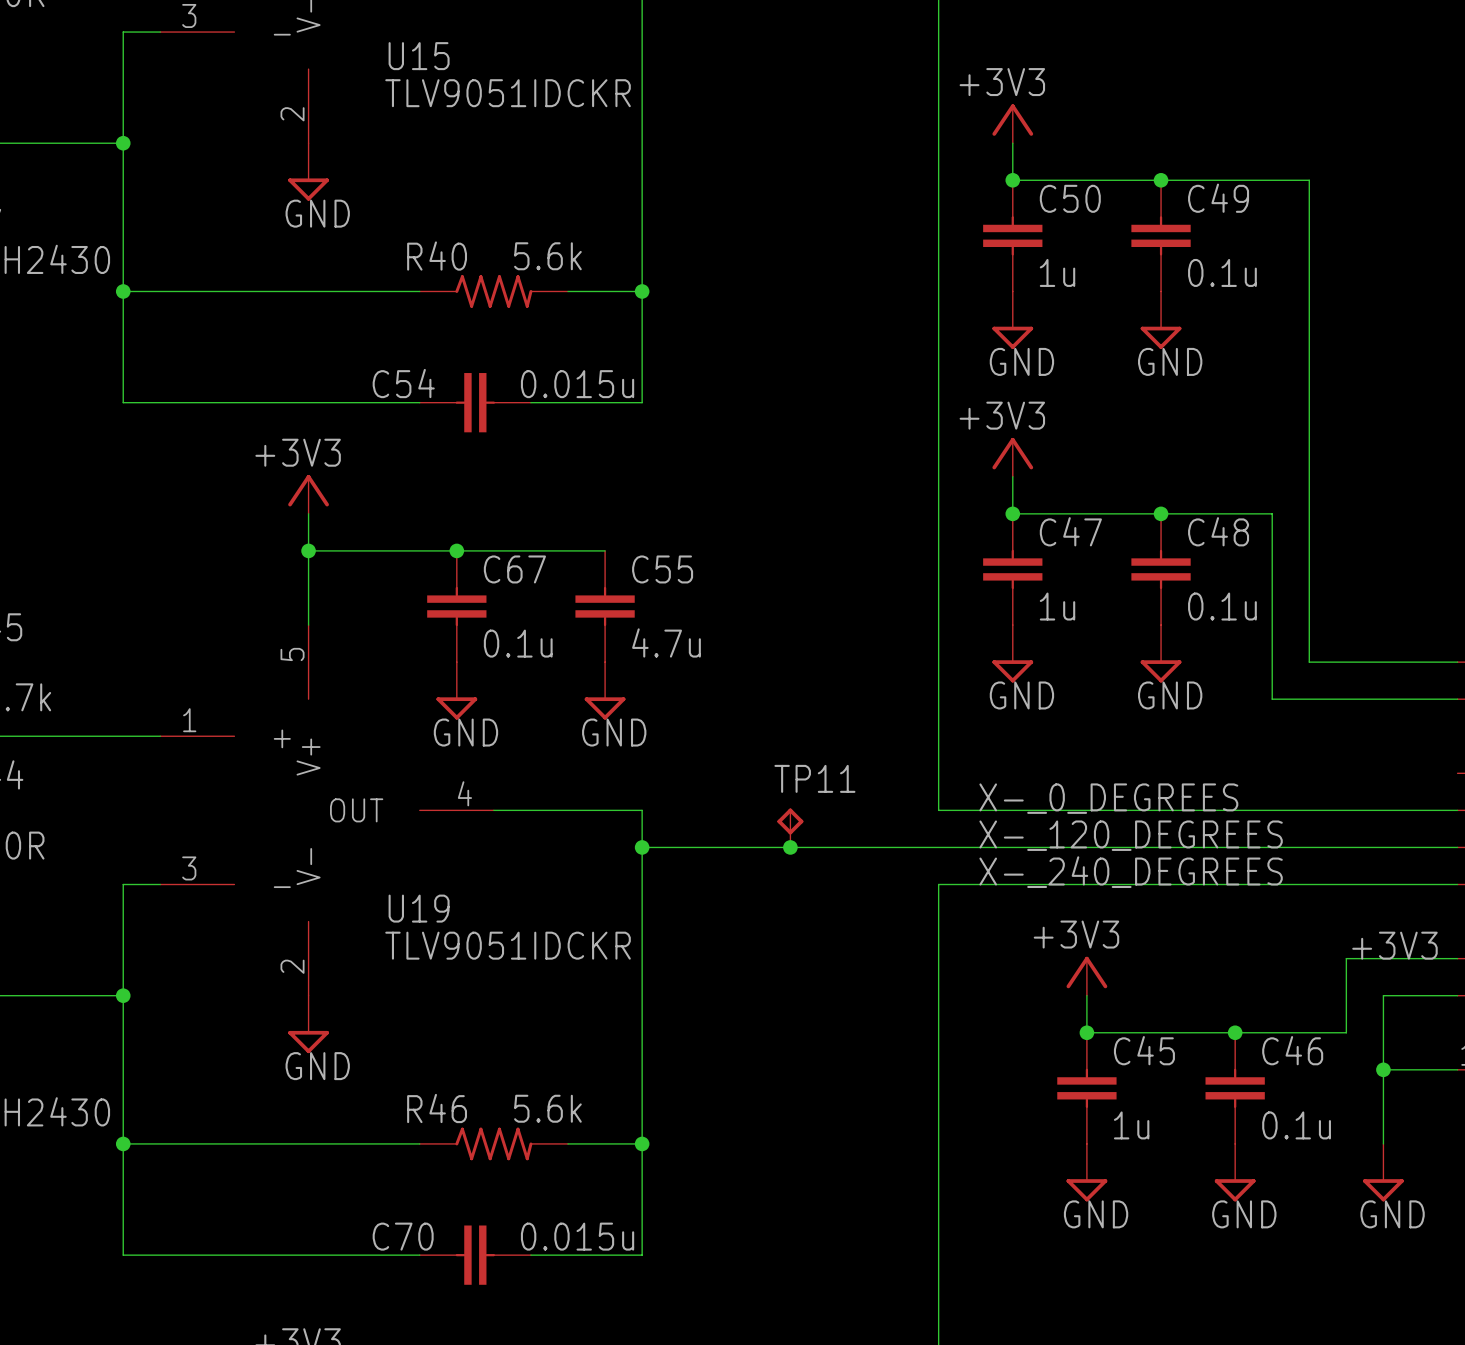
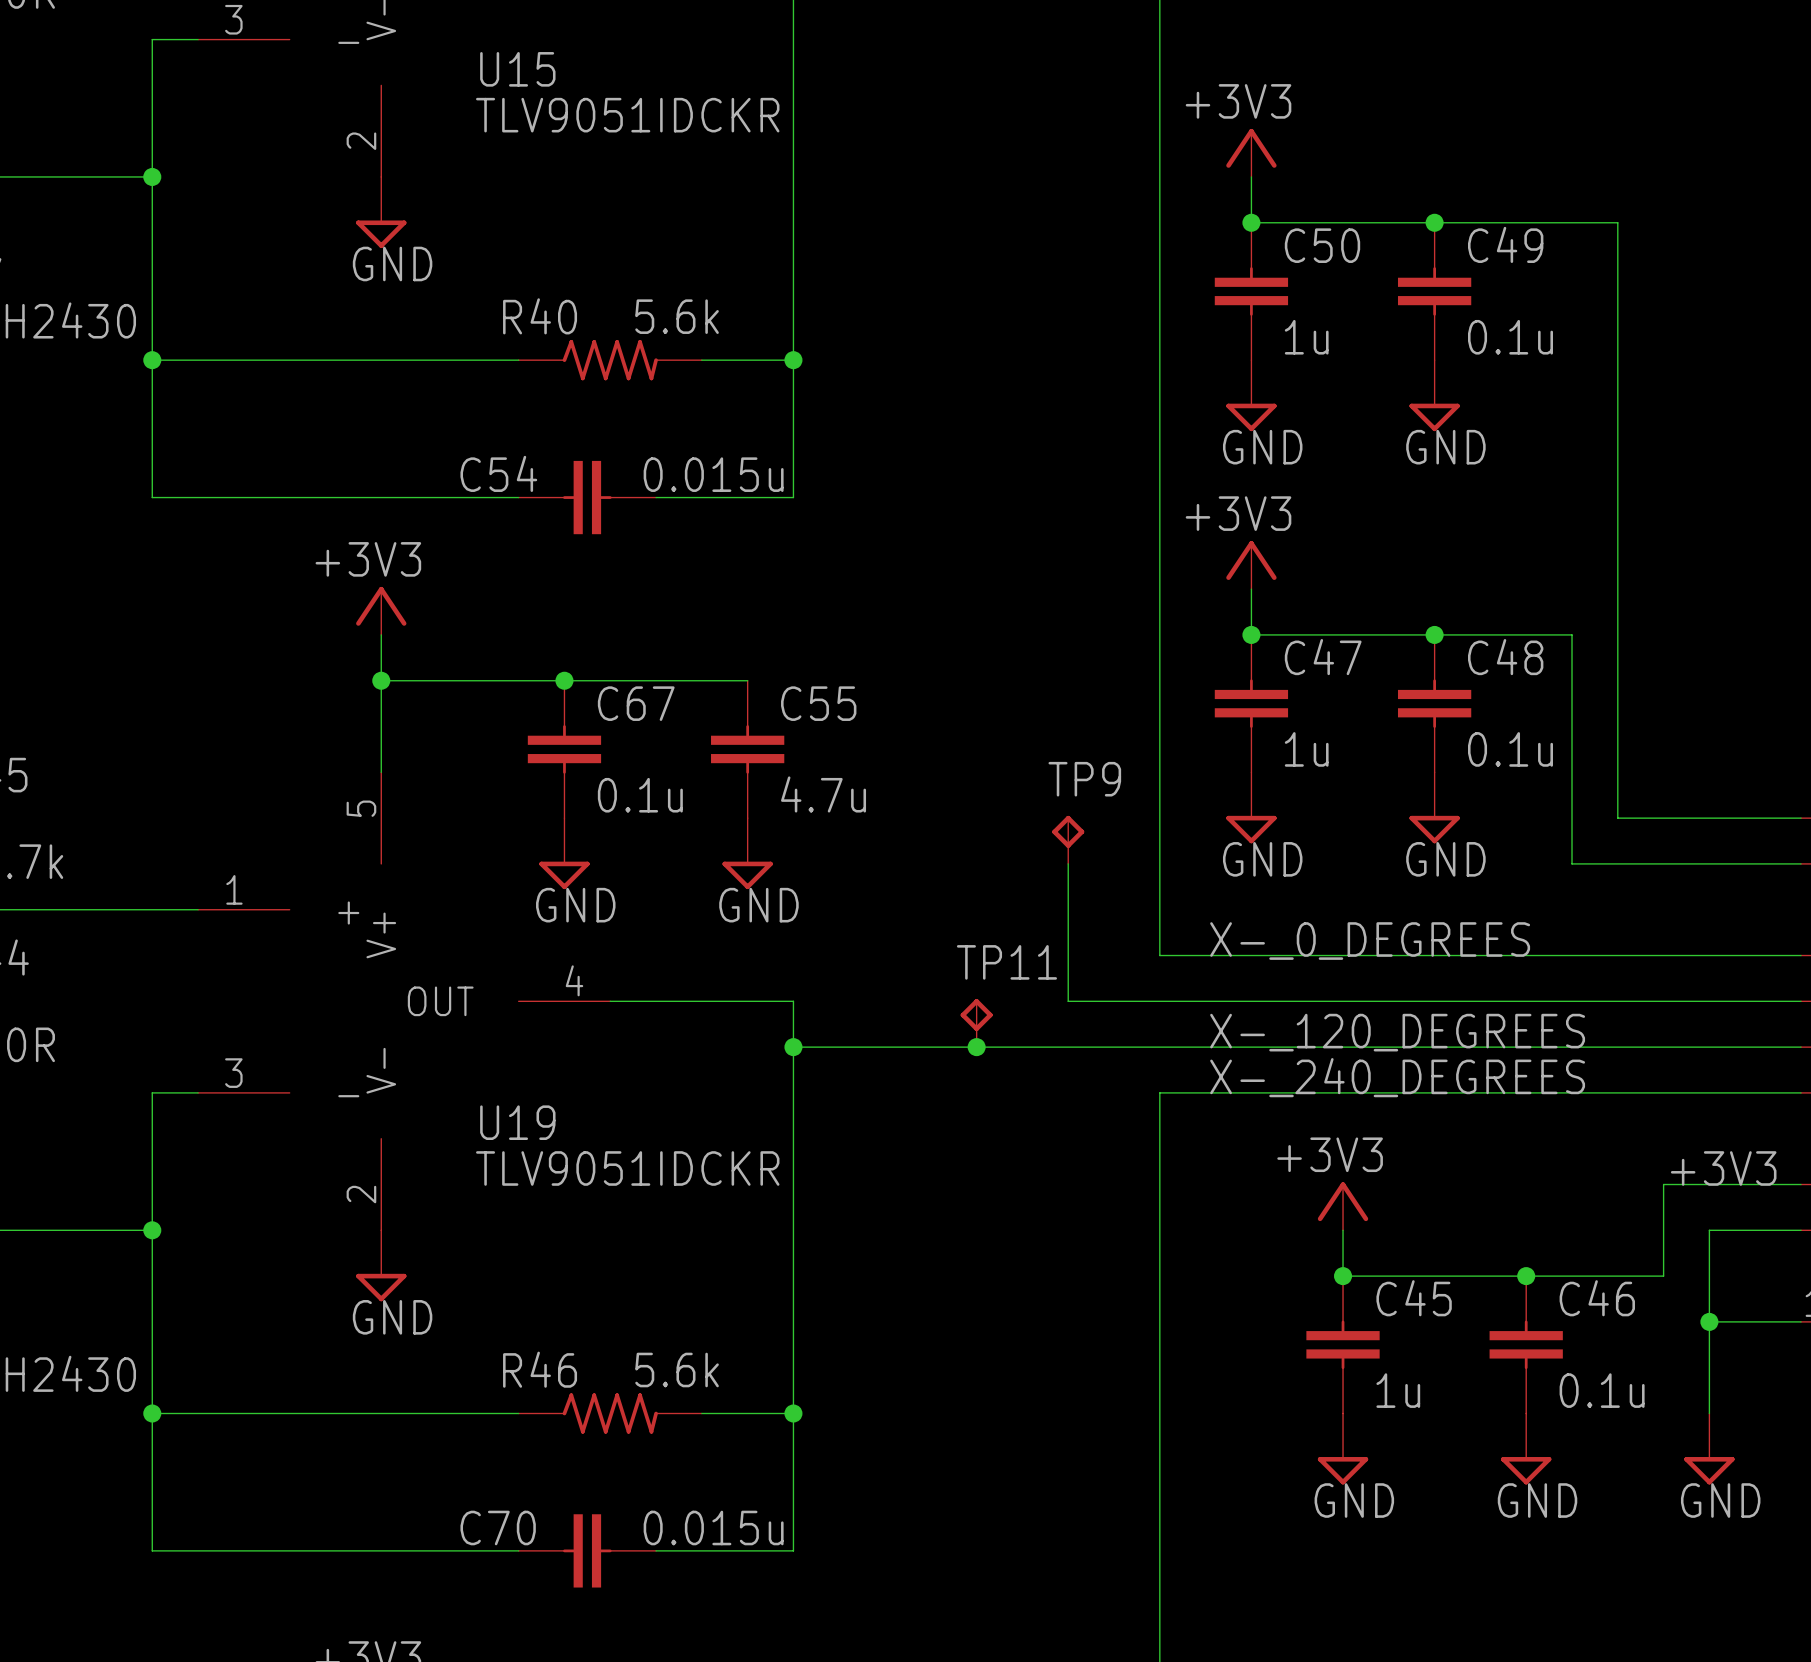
TP9: none -> (1068, 839)
wire: (938, 773) (938, 810) -> (1068, 863) (1068, 1001) (1159, 1001)
wire: none -> (1159, 955) (1800, 955)
label position: X-_0_DEGREES (1108, 798) -> X-_0_DEGREES (1370, 941)

